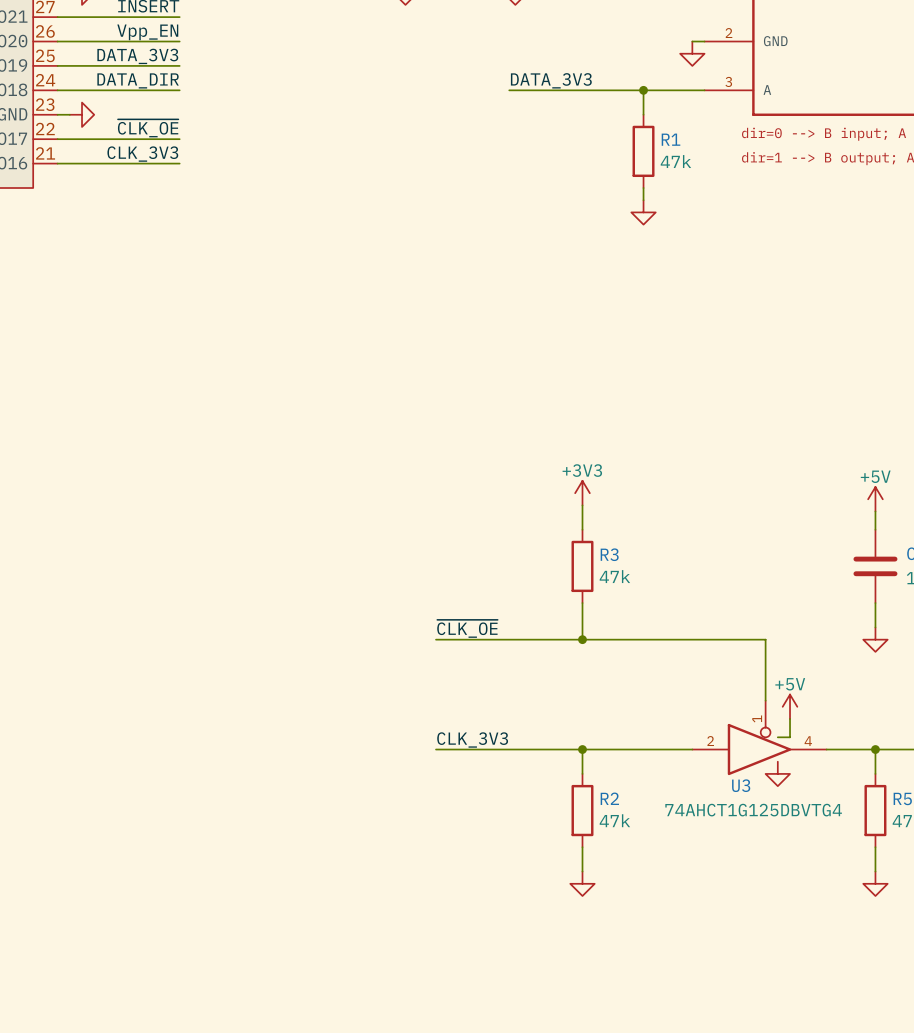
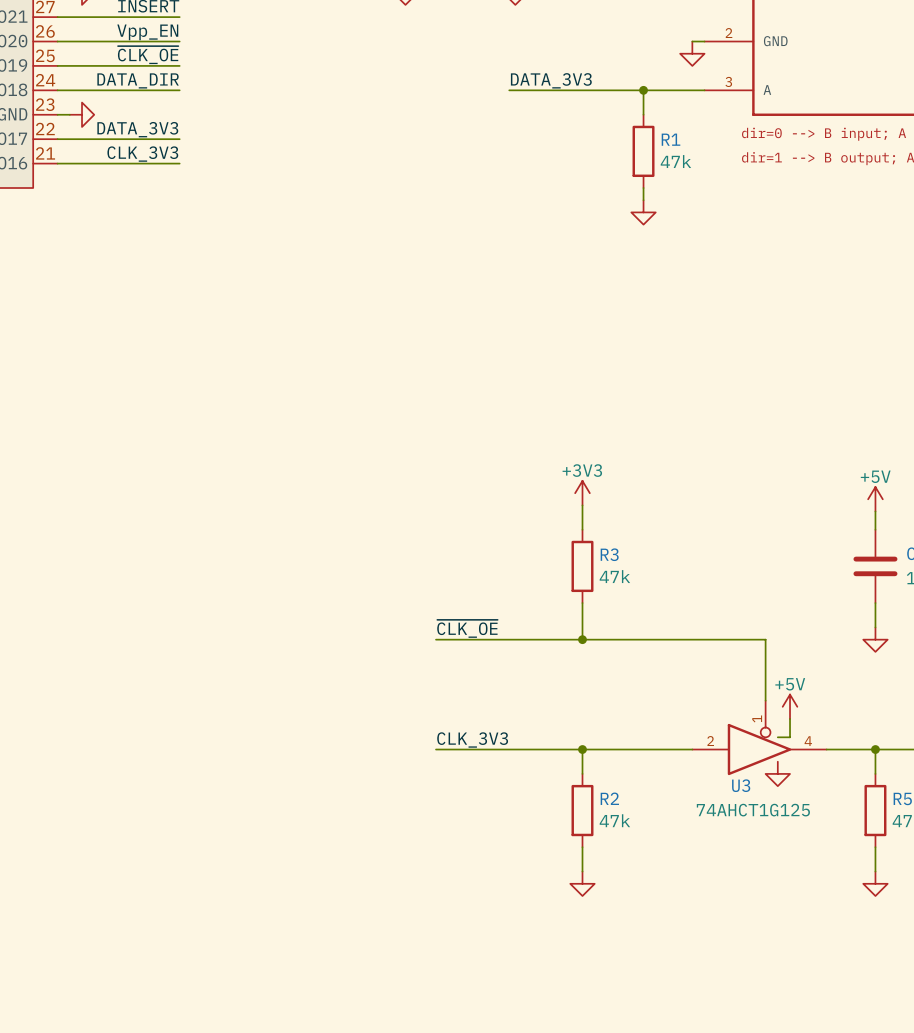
label: DATA_3V3 (137, 56) -> ~{CLK_OE} (148, 55)
label: ~{CLK_OE} (148, 128) -> DATA_3V3 (137, 129)
U3 value: 74AHCT1G125DBVTG4 (753, 810) -> 74AHCT1G125 (753, 810)

